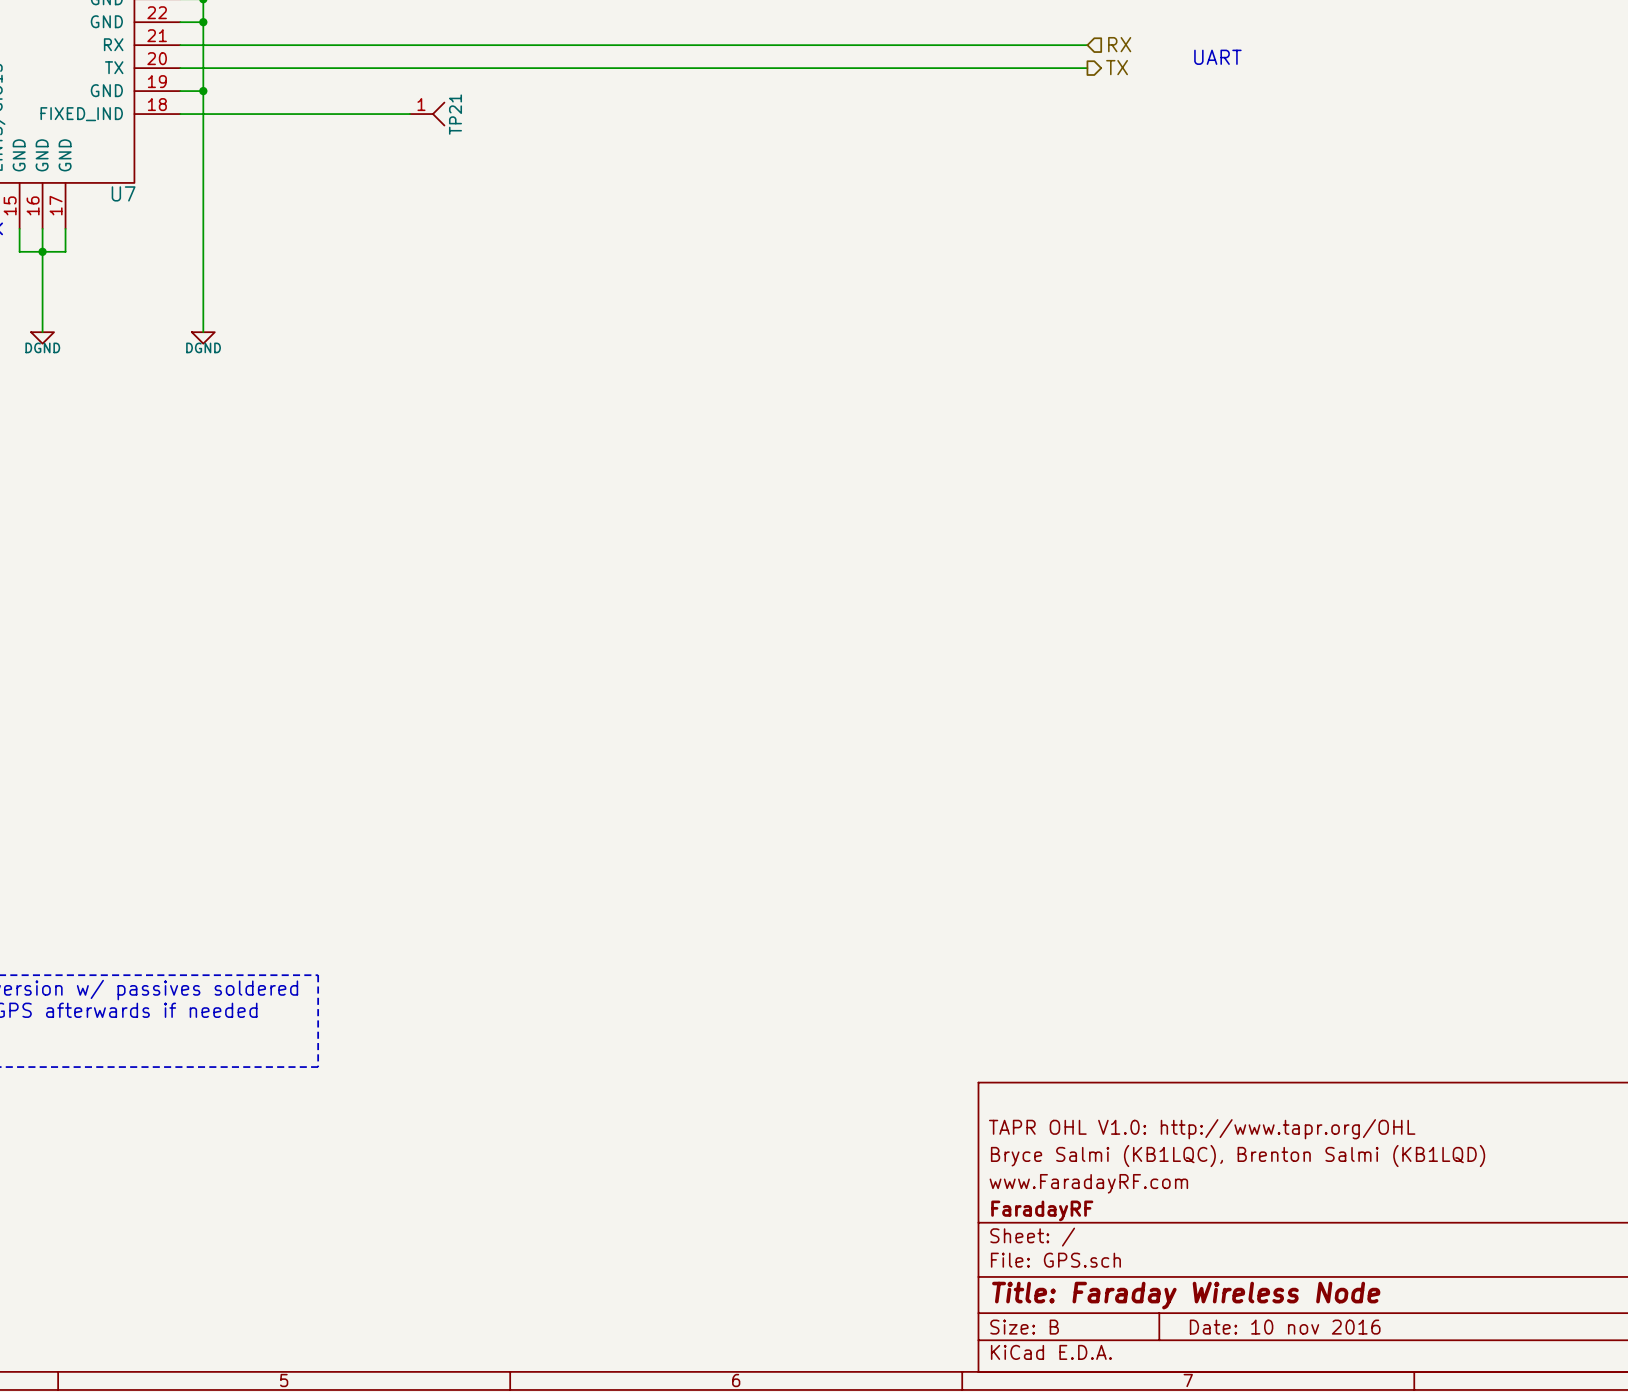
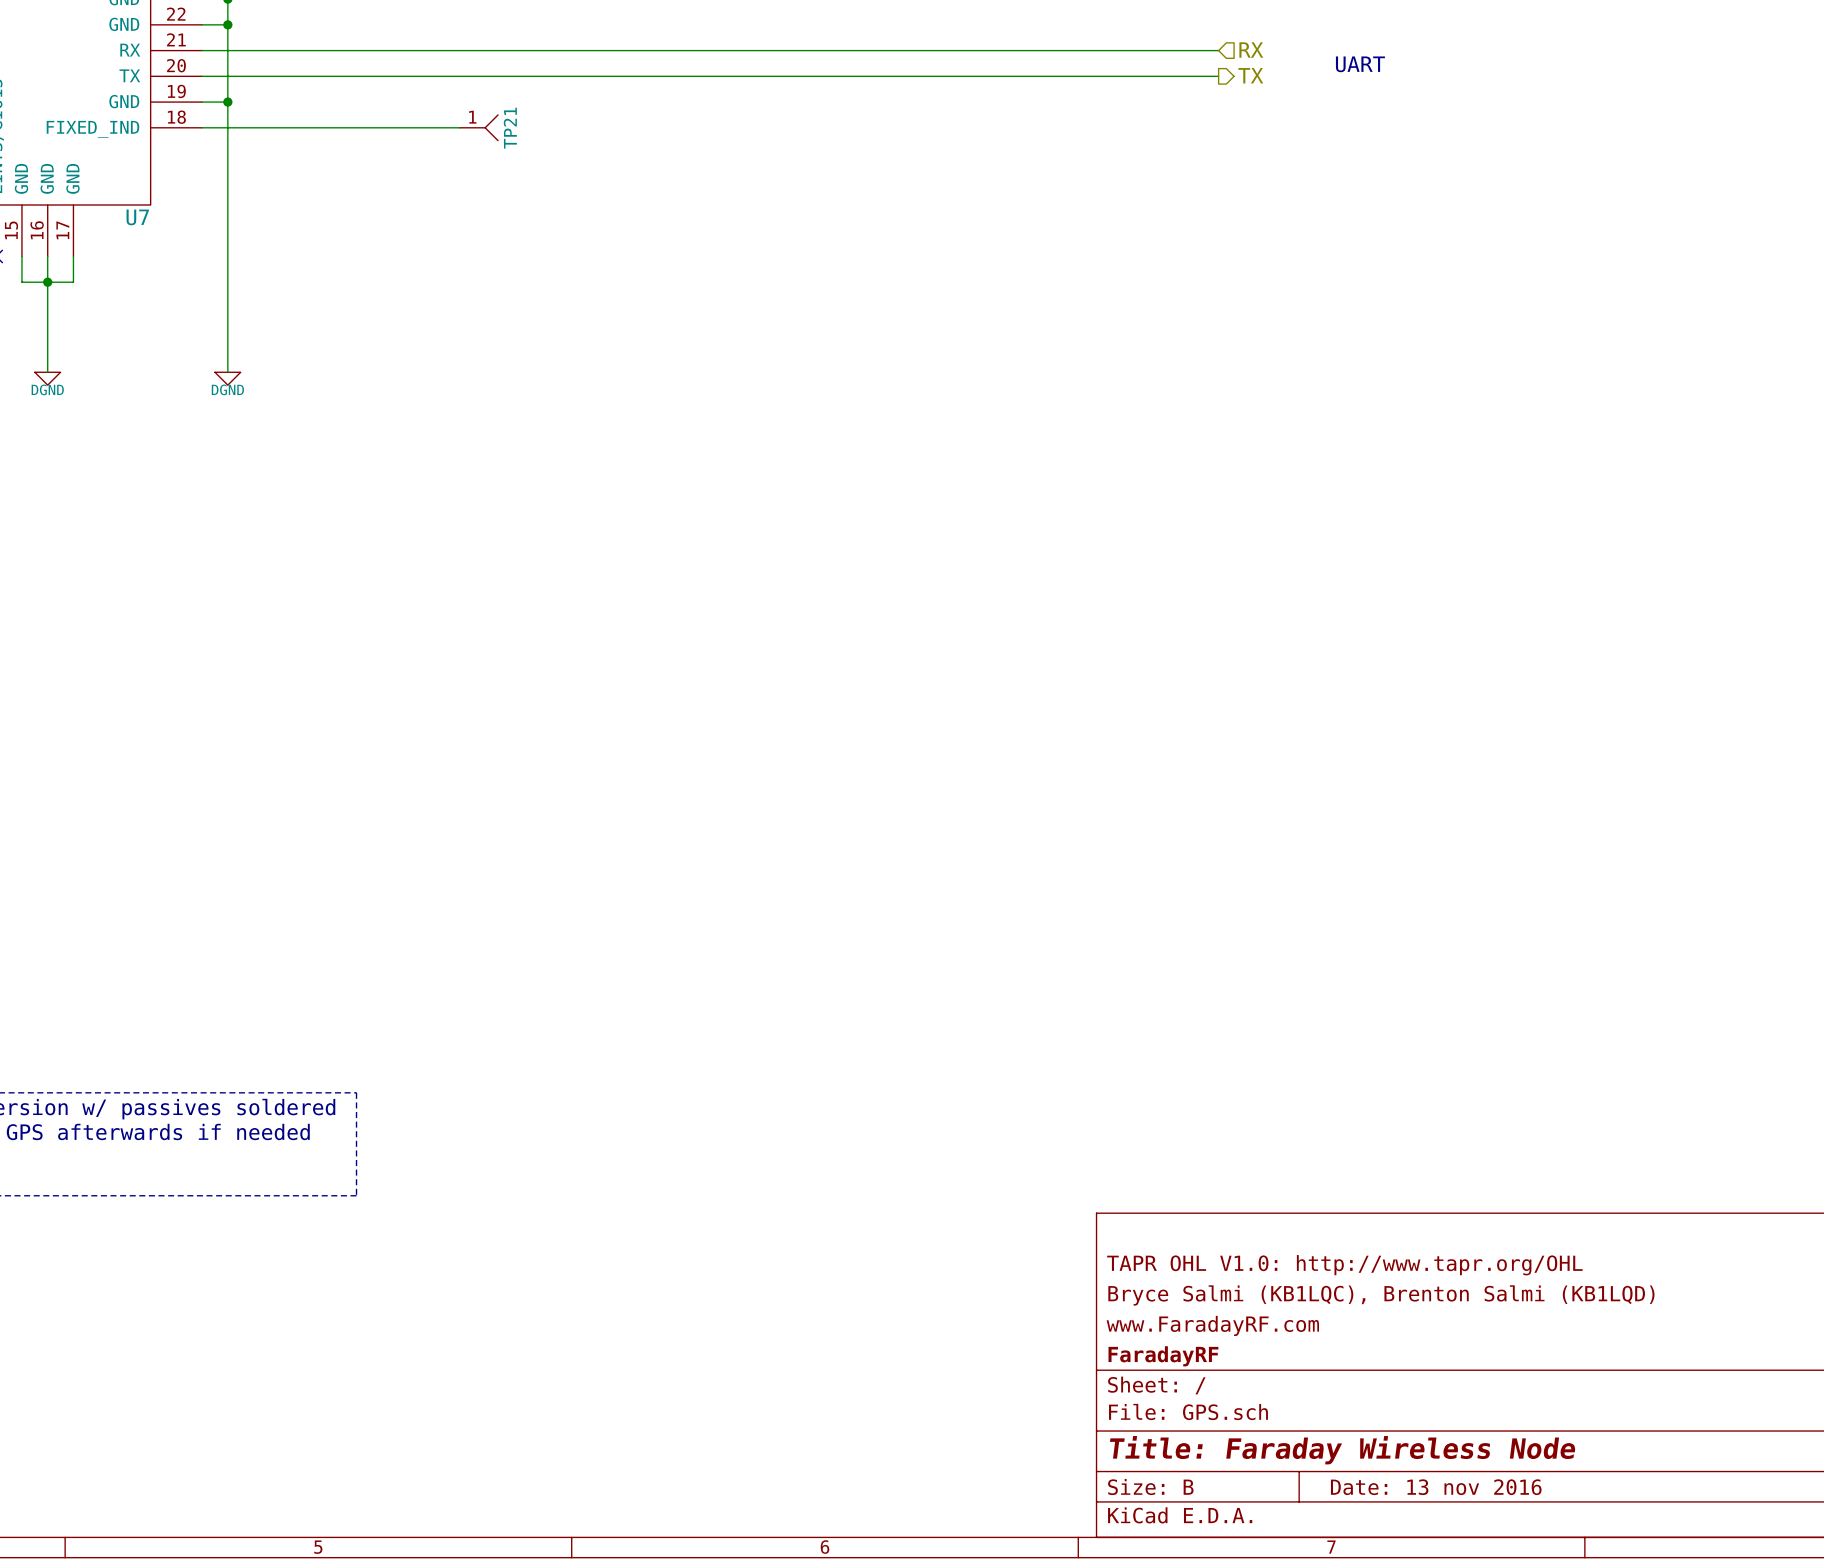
title block: Date: 10 nov 2016 (1285, 1327) -> Date: 13 nov 2016 (1436, 1487)

